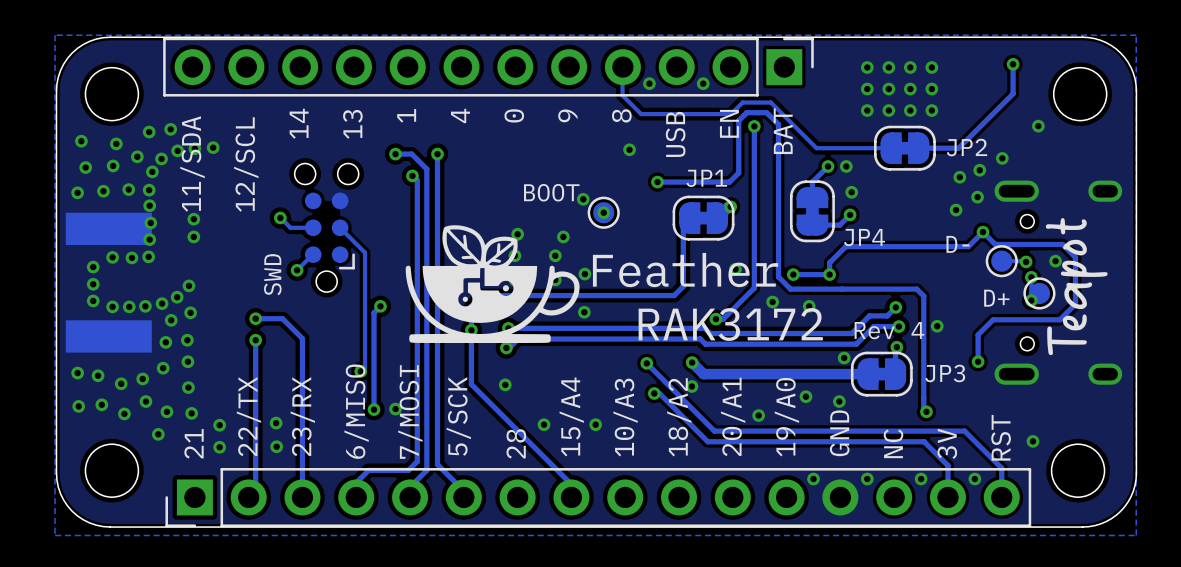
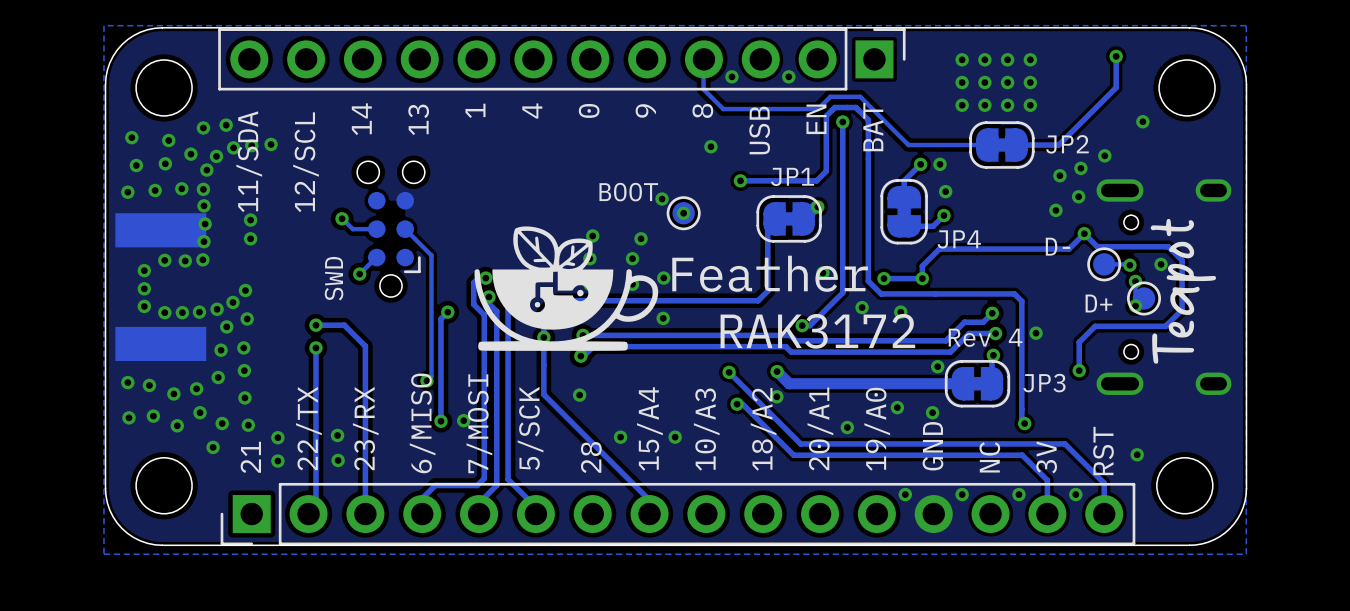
track: (395, 154) (411, 154) (426, 169) (426, 305) -> (488, 296) (488, 303) (496, 311)
via: (395, 154) -> none
track: (437, 154) (437, 291) -> none
via: (437, 154) -> none
track: (412, 175) (417, 180) (417, 461) (415, 463) -> (485, 278) (478, 278) (473, 282) (473, 304) (484, 314) (484, 478)
via: (412, 175) -> none
via: none -> (485, 278)
via: none -> (488, 296)

